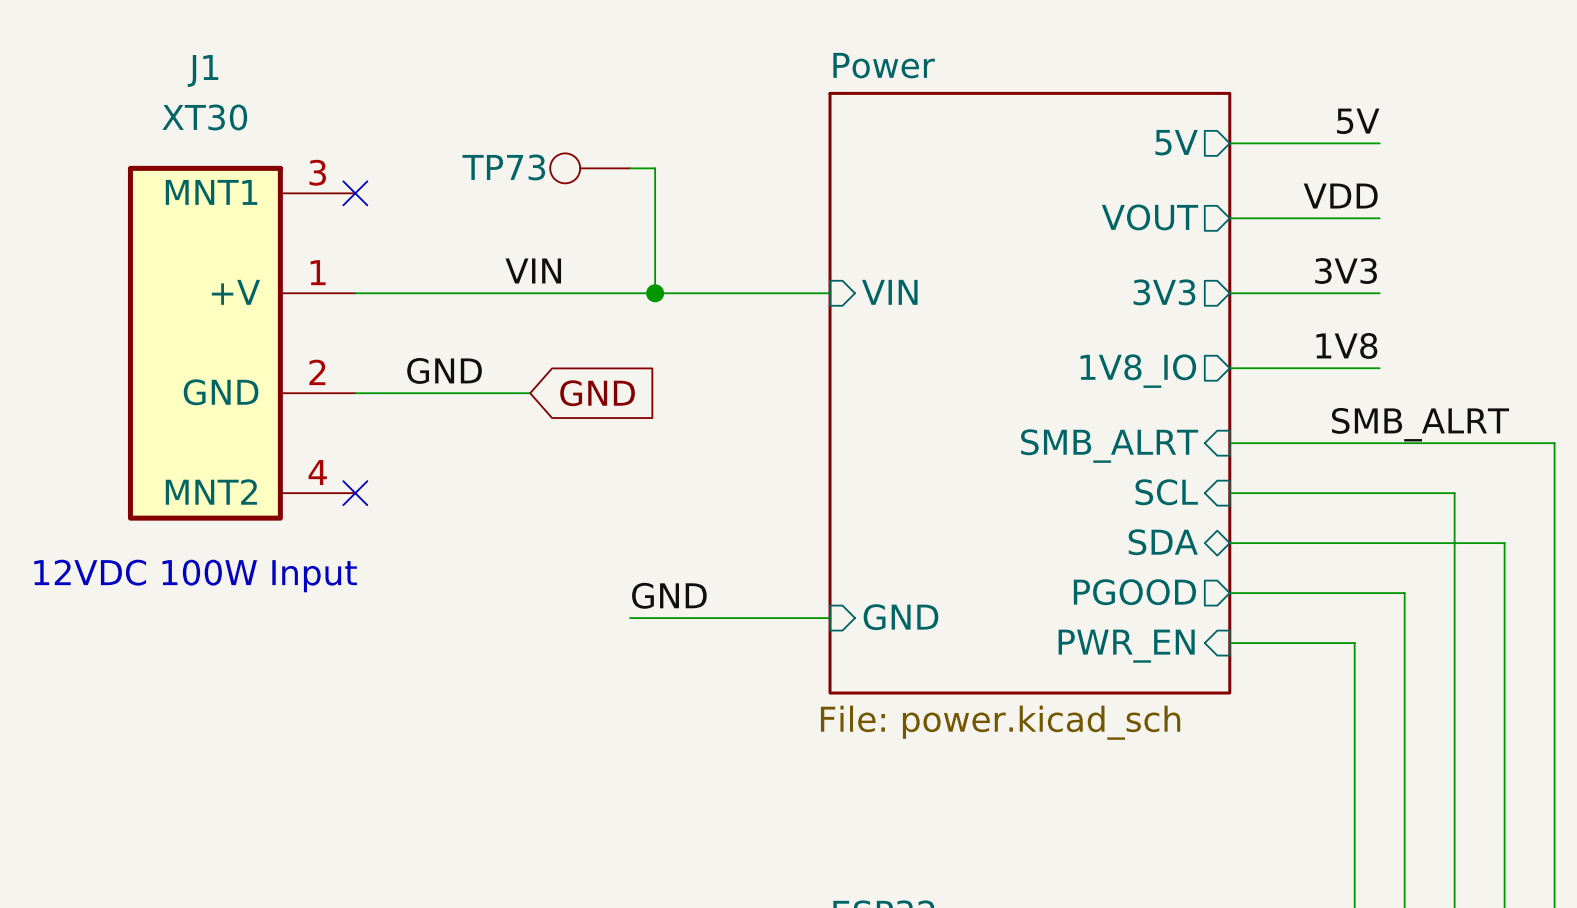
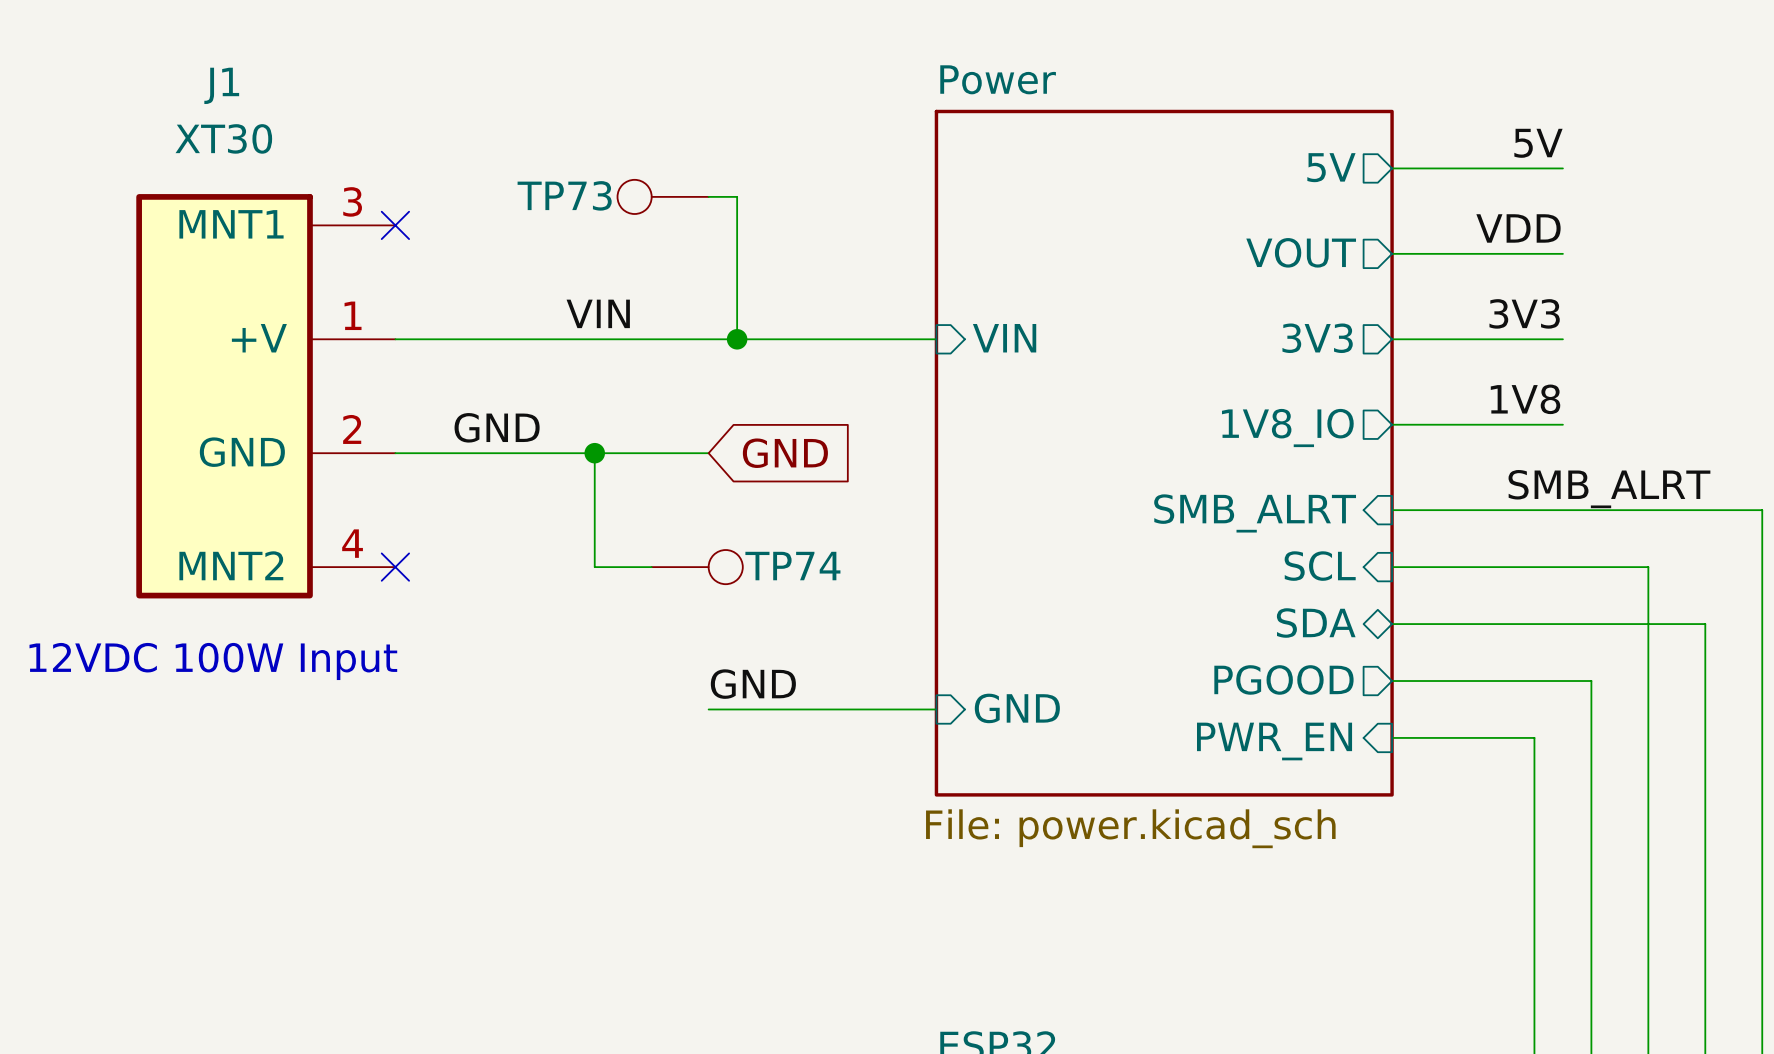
junction: none -> (594, 453)
global label position: GND (597, 393) -> GND (785, 453)
wire: none -> (708, 453) (594, 453) (594, 567) (651, 567)
TP74: none -> (697, 567)

